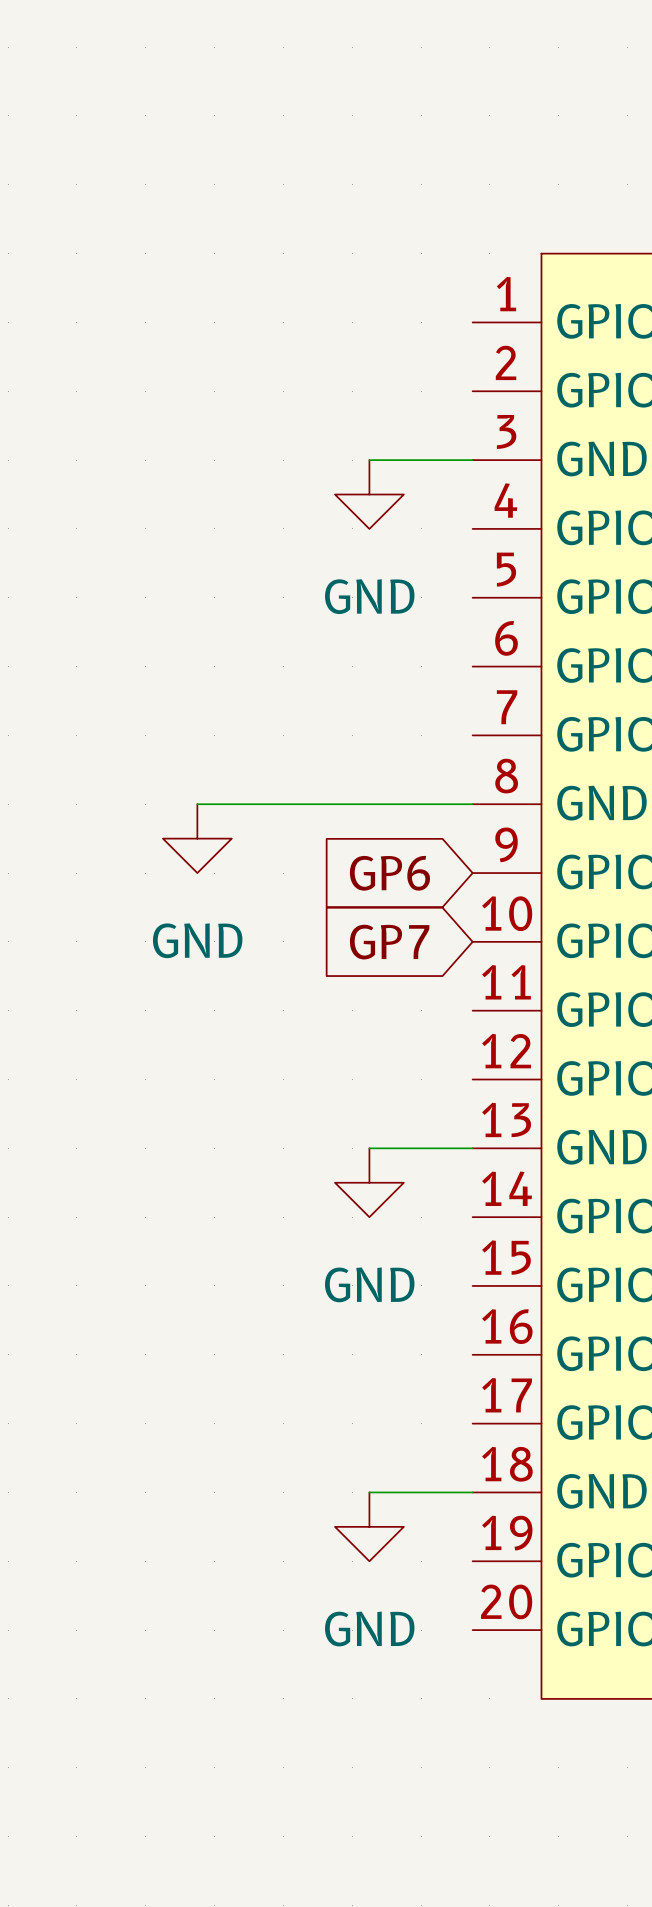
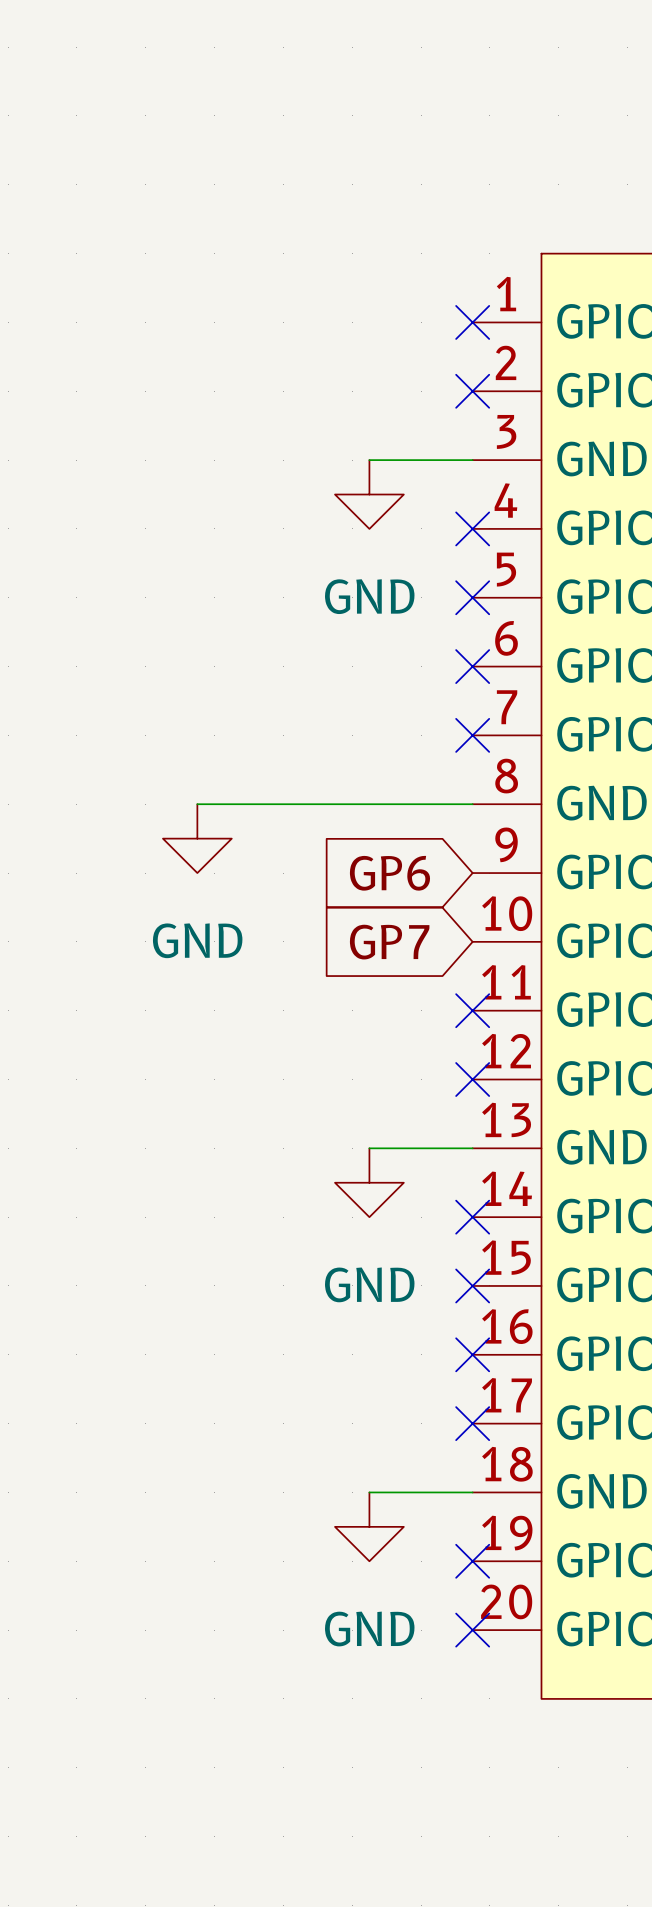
no-connect mark: none -> (472, 322)
no-connect mark: none -> (472, 391)
no-connect mark: none -> (472, 528)
no-connect mark: none -> (472, 597)
no-connect mark: none -> (472, 666)
no-connect mark: none -> (472, 735)
no-connect mark: none -> (472, 1010)
no-connect mark: none -> (472, 1079)
no-connect mark: none -> (472, 1217)
no-connect mark: none -> (472, 1285)
no-connect mark: none -> (472, 1354)
no-connect mark: none -> (472, 1423)
no-connect mark: none -> (472, 1561)
no-connect mark: none -> (472, 1630)

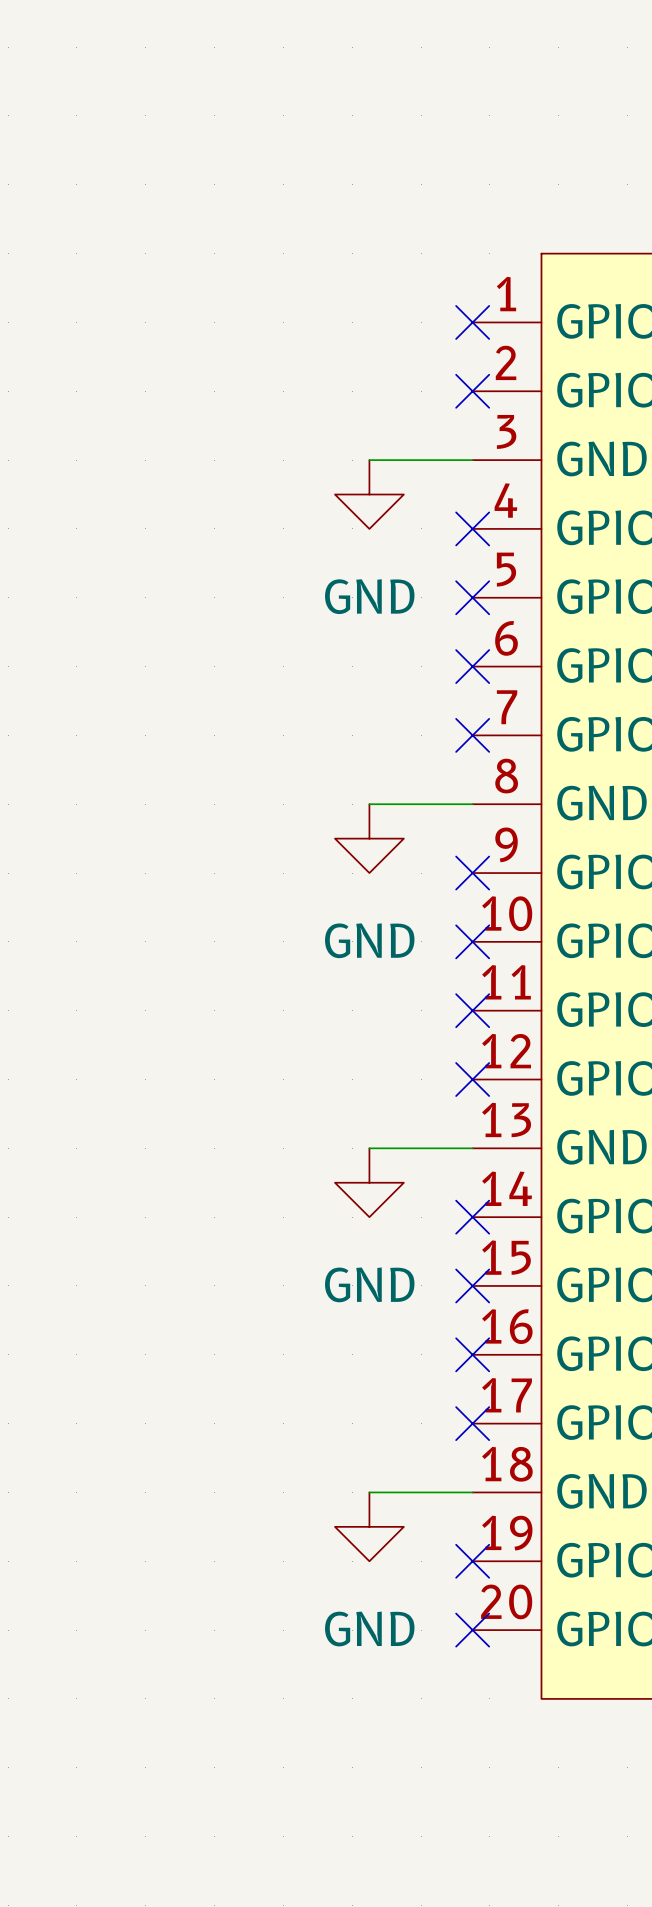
wire: (197, 804) (369, 804) -> none
power symbol position: GND (197, 838) -> GND (369, 838)
global label: GP6 (389, 873) -> none
no-connect mark: none -> (472, 873)
no-connect mark: none -> (472, 941)
global label: GP7 (389, 942) -> none

